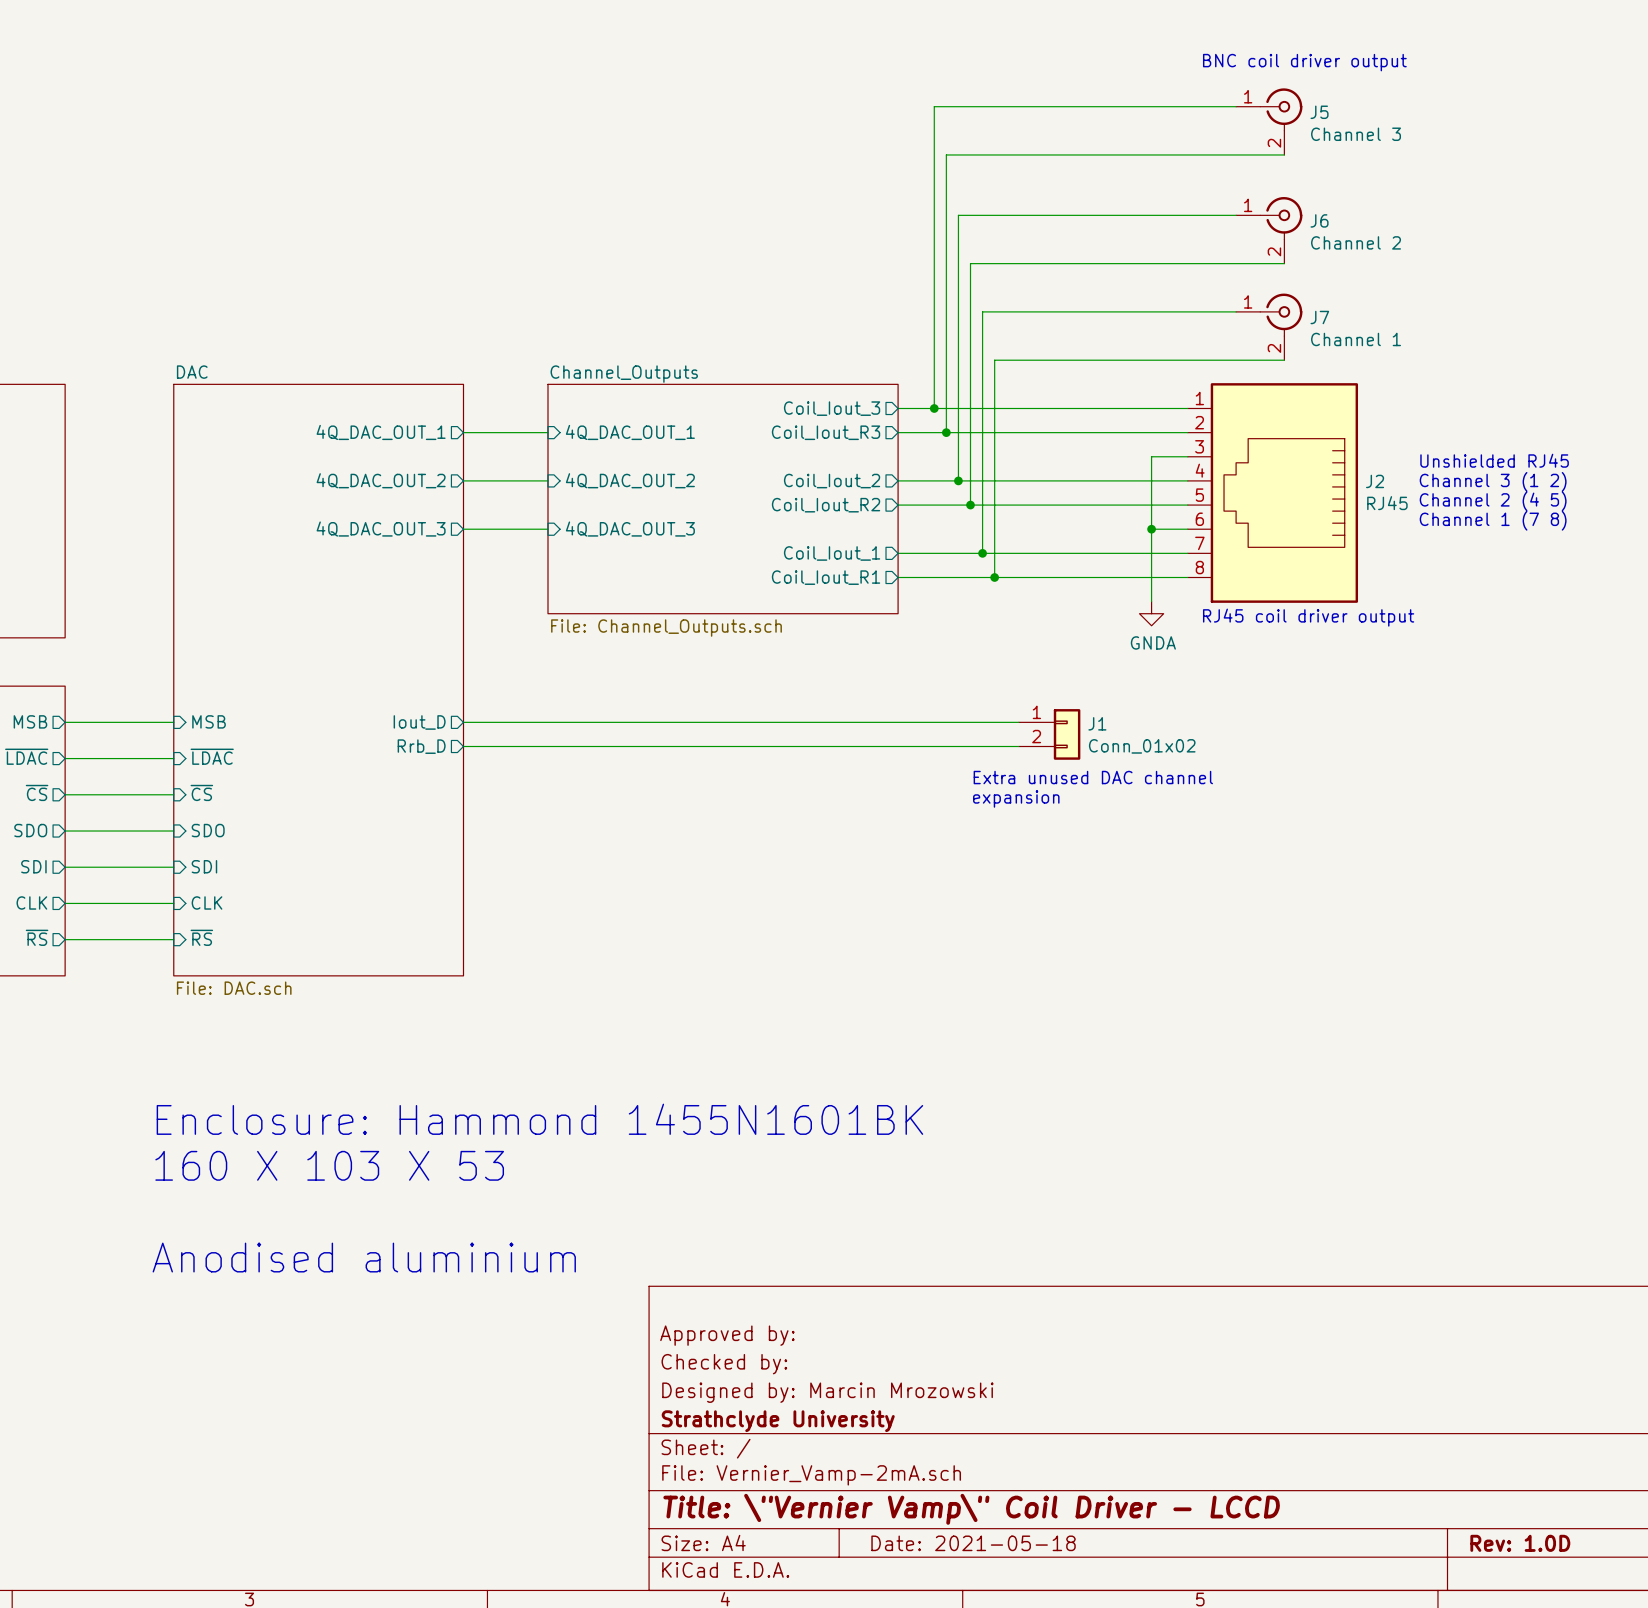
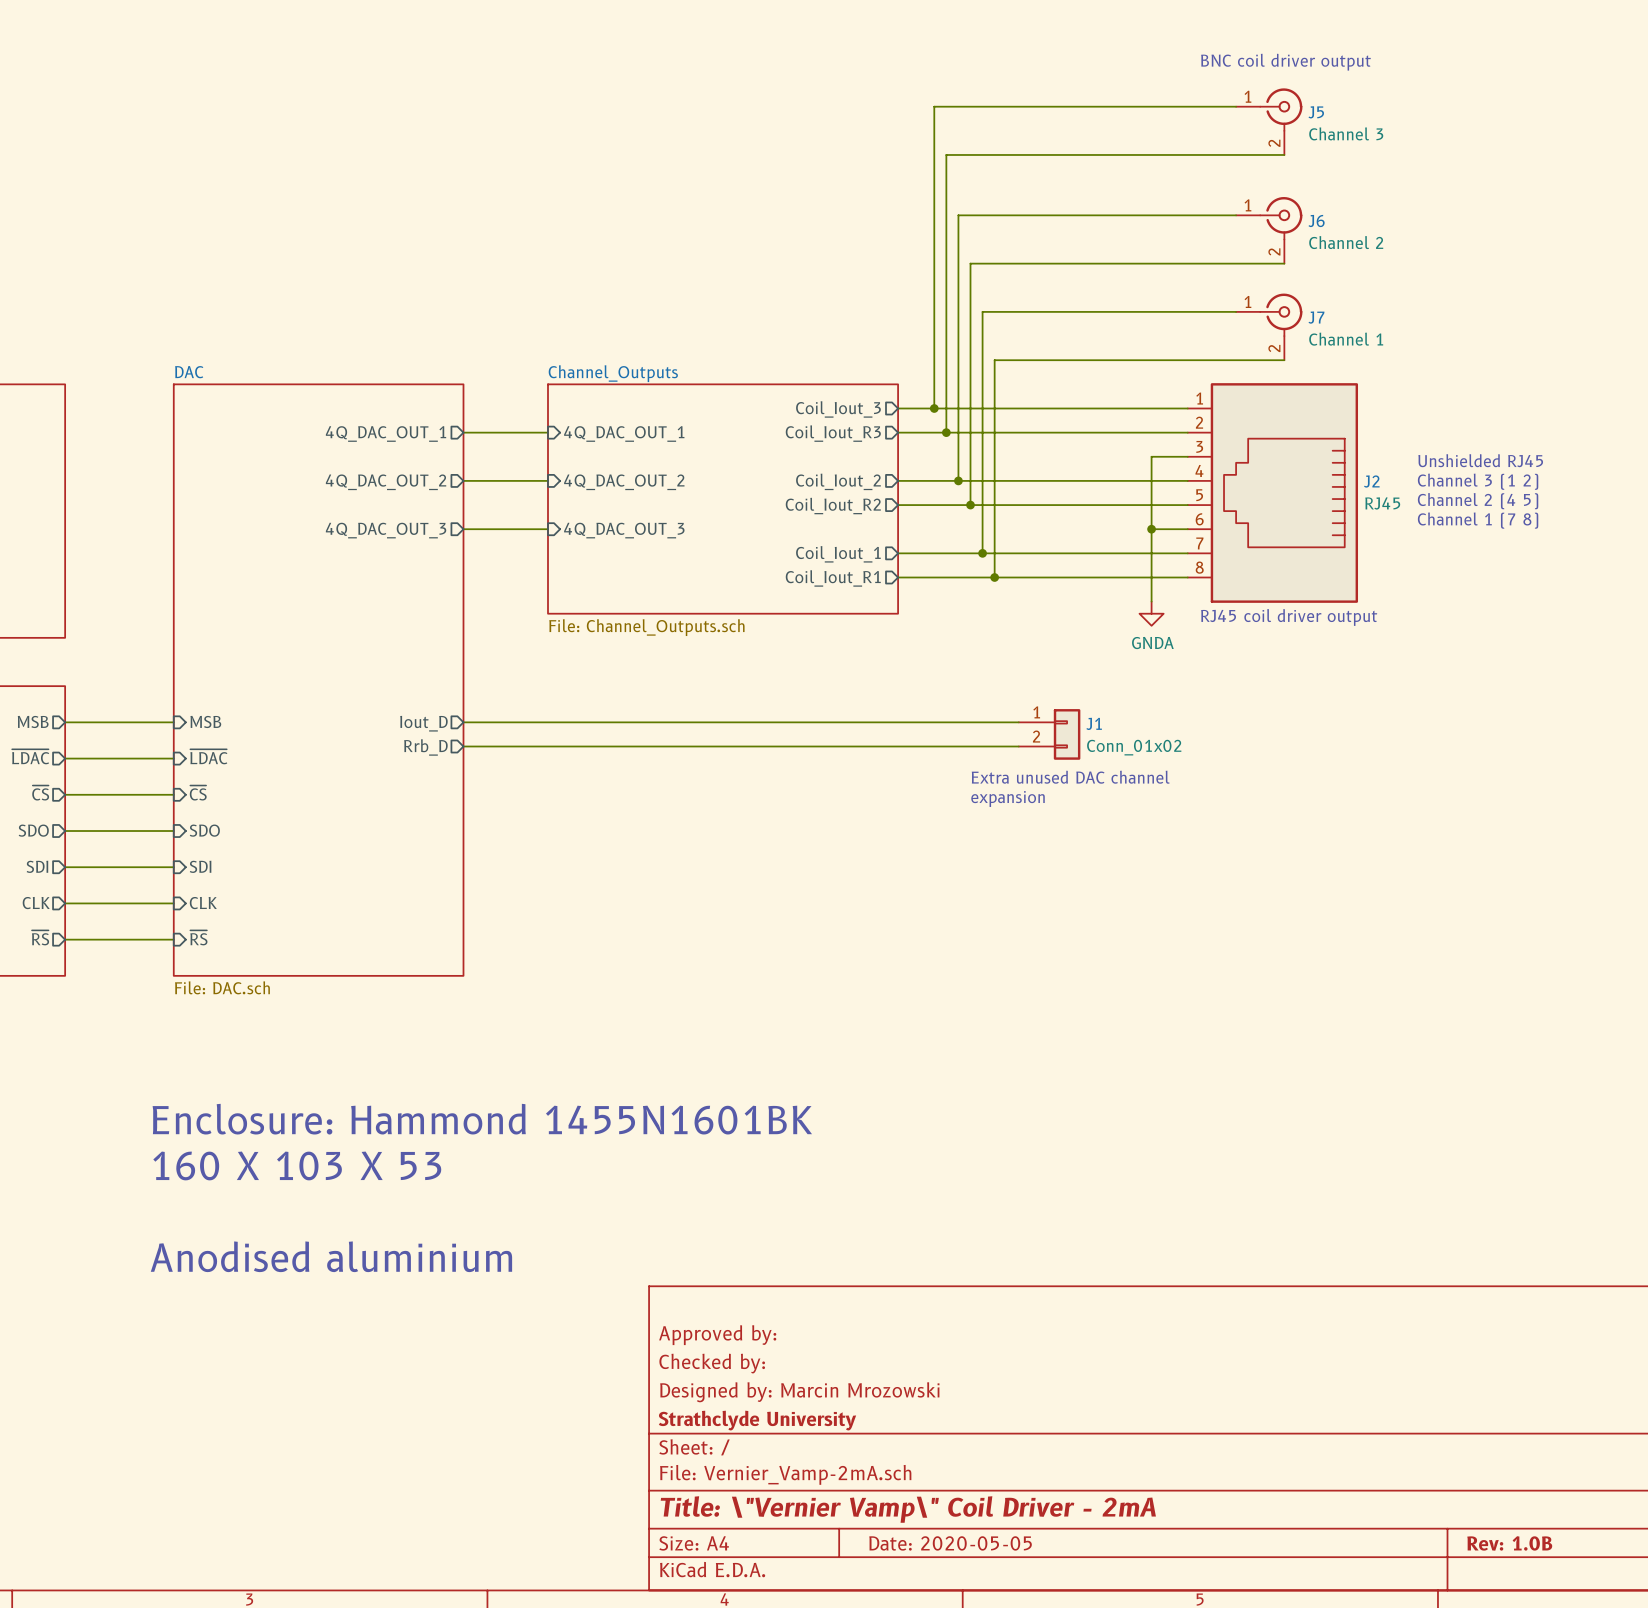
title block: Title: \"Vernier Vamp\" Coil Driver - LCCD (971, 1509) -> Title: \"Vernier Vamp\" Coil Driver - 2mA (908, 1509)
title block: Date: 2021-05-18 (973, 1543) -> Date: 2020-05-05 (950, 1543)
title block: Rev: 1.0D (1520, 1543) -> Rev: 1.0B (1509, 1543)

